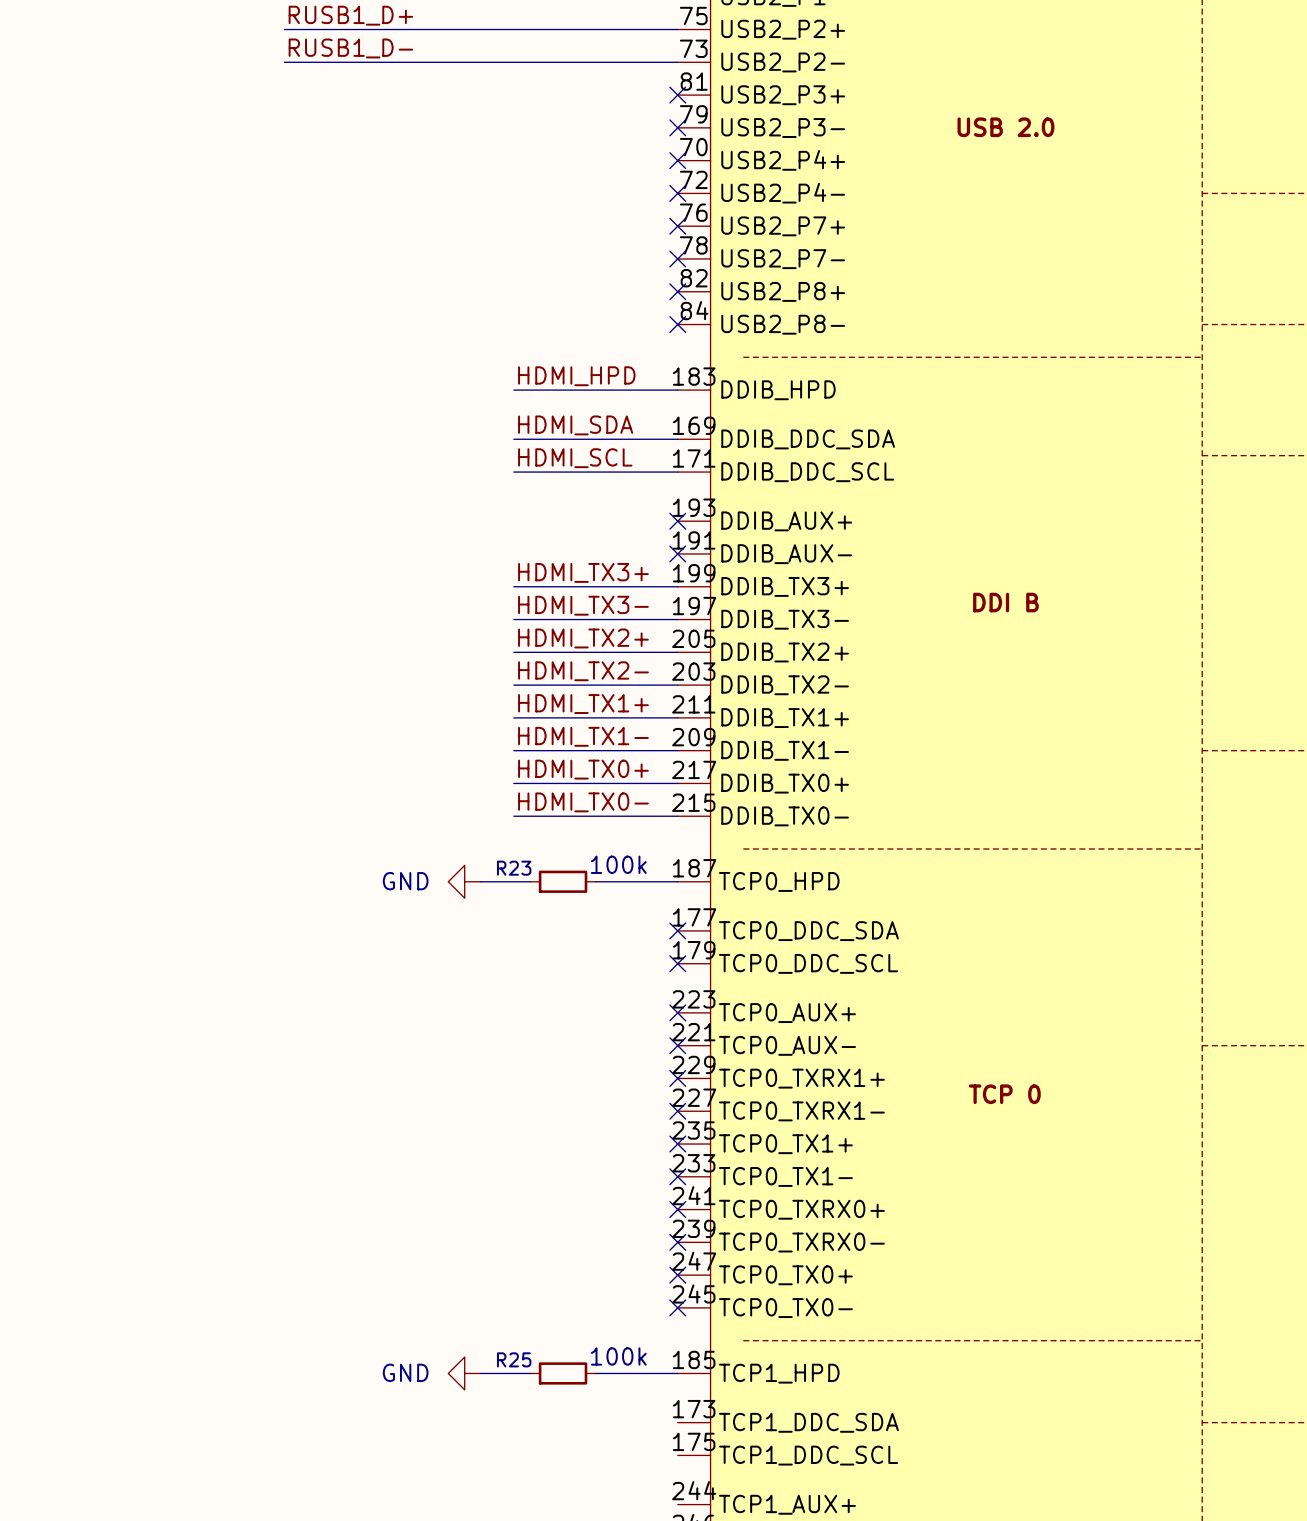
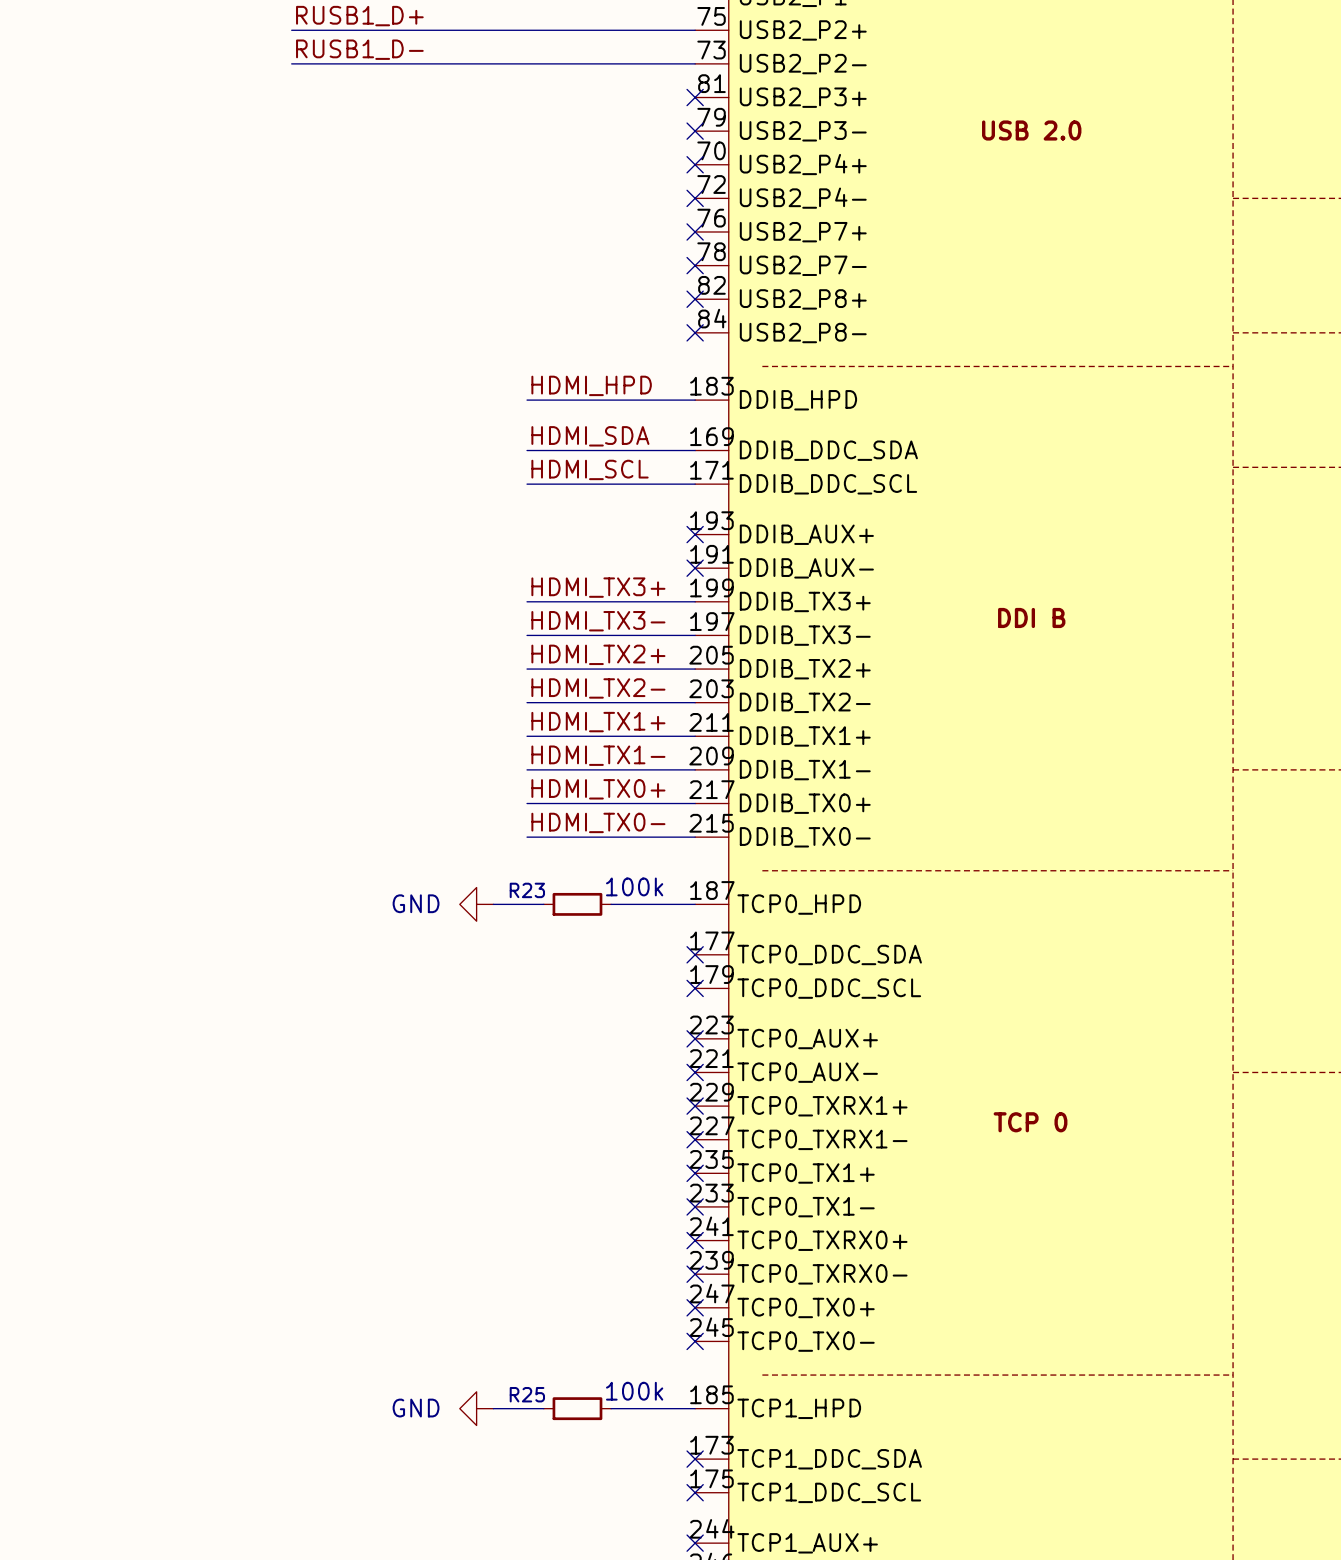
no-connect mark: none -> (695, 1459)
no-connect mark: none -> (695, 1492)
no-connect mark: none -> (695, 1543)

